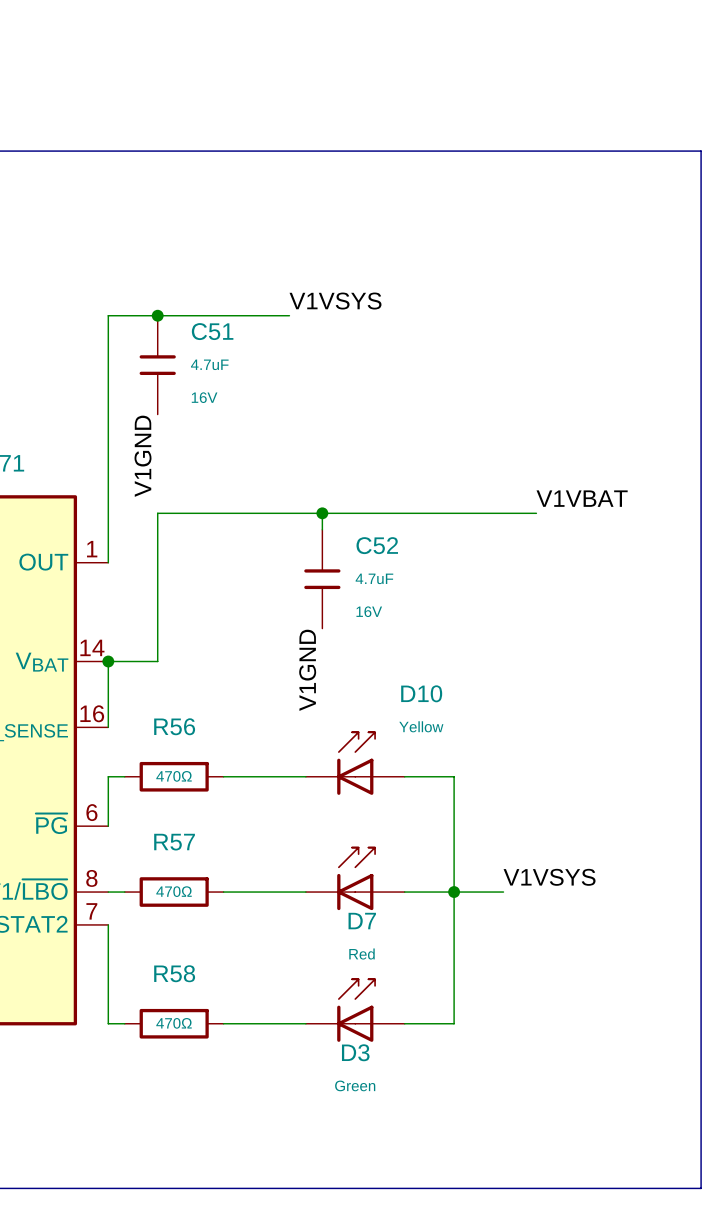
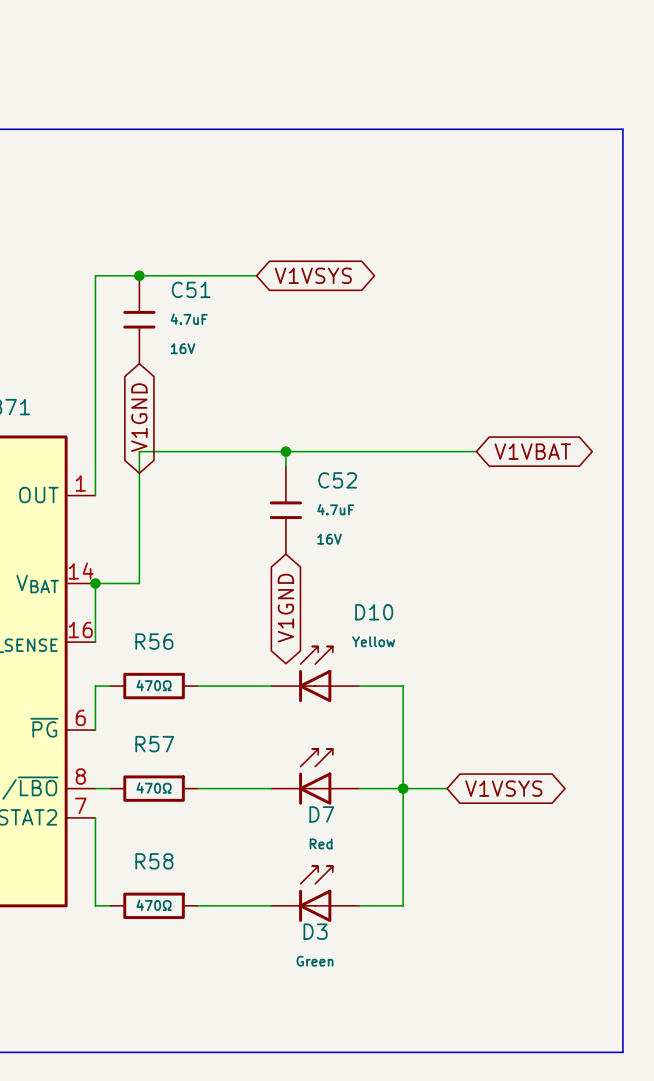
label: V1VSYS (335, 301) -> none
global label: none -> V1VSYS (313, 275)
label: V1GND (143, 456) -> none
global label: none -> V1GND (139, 417)
label: V1VBAT (582, 498) -> none
global label: none -> V1VBAT (532, 451)
label: V1GND (307, 670) -> none
global label: none -> V1GND (285, 608)
label: V1VSYS (549, 877) -> none
global label: none -> V1VSYS (503, 788)

